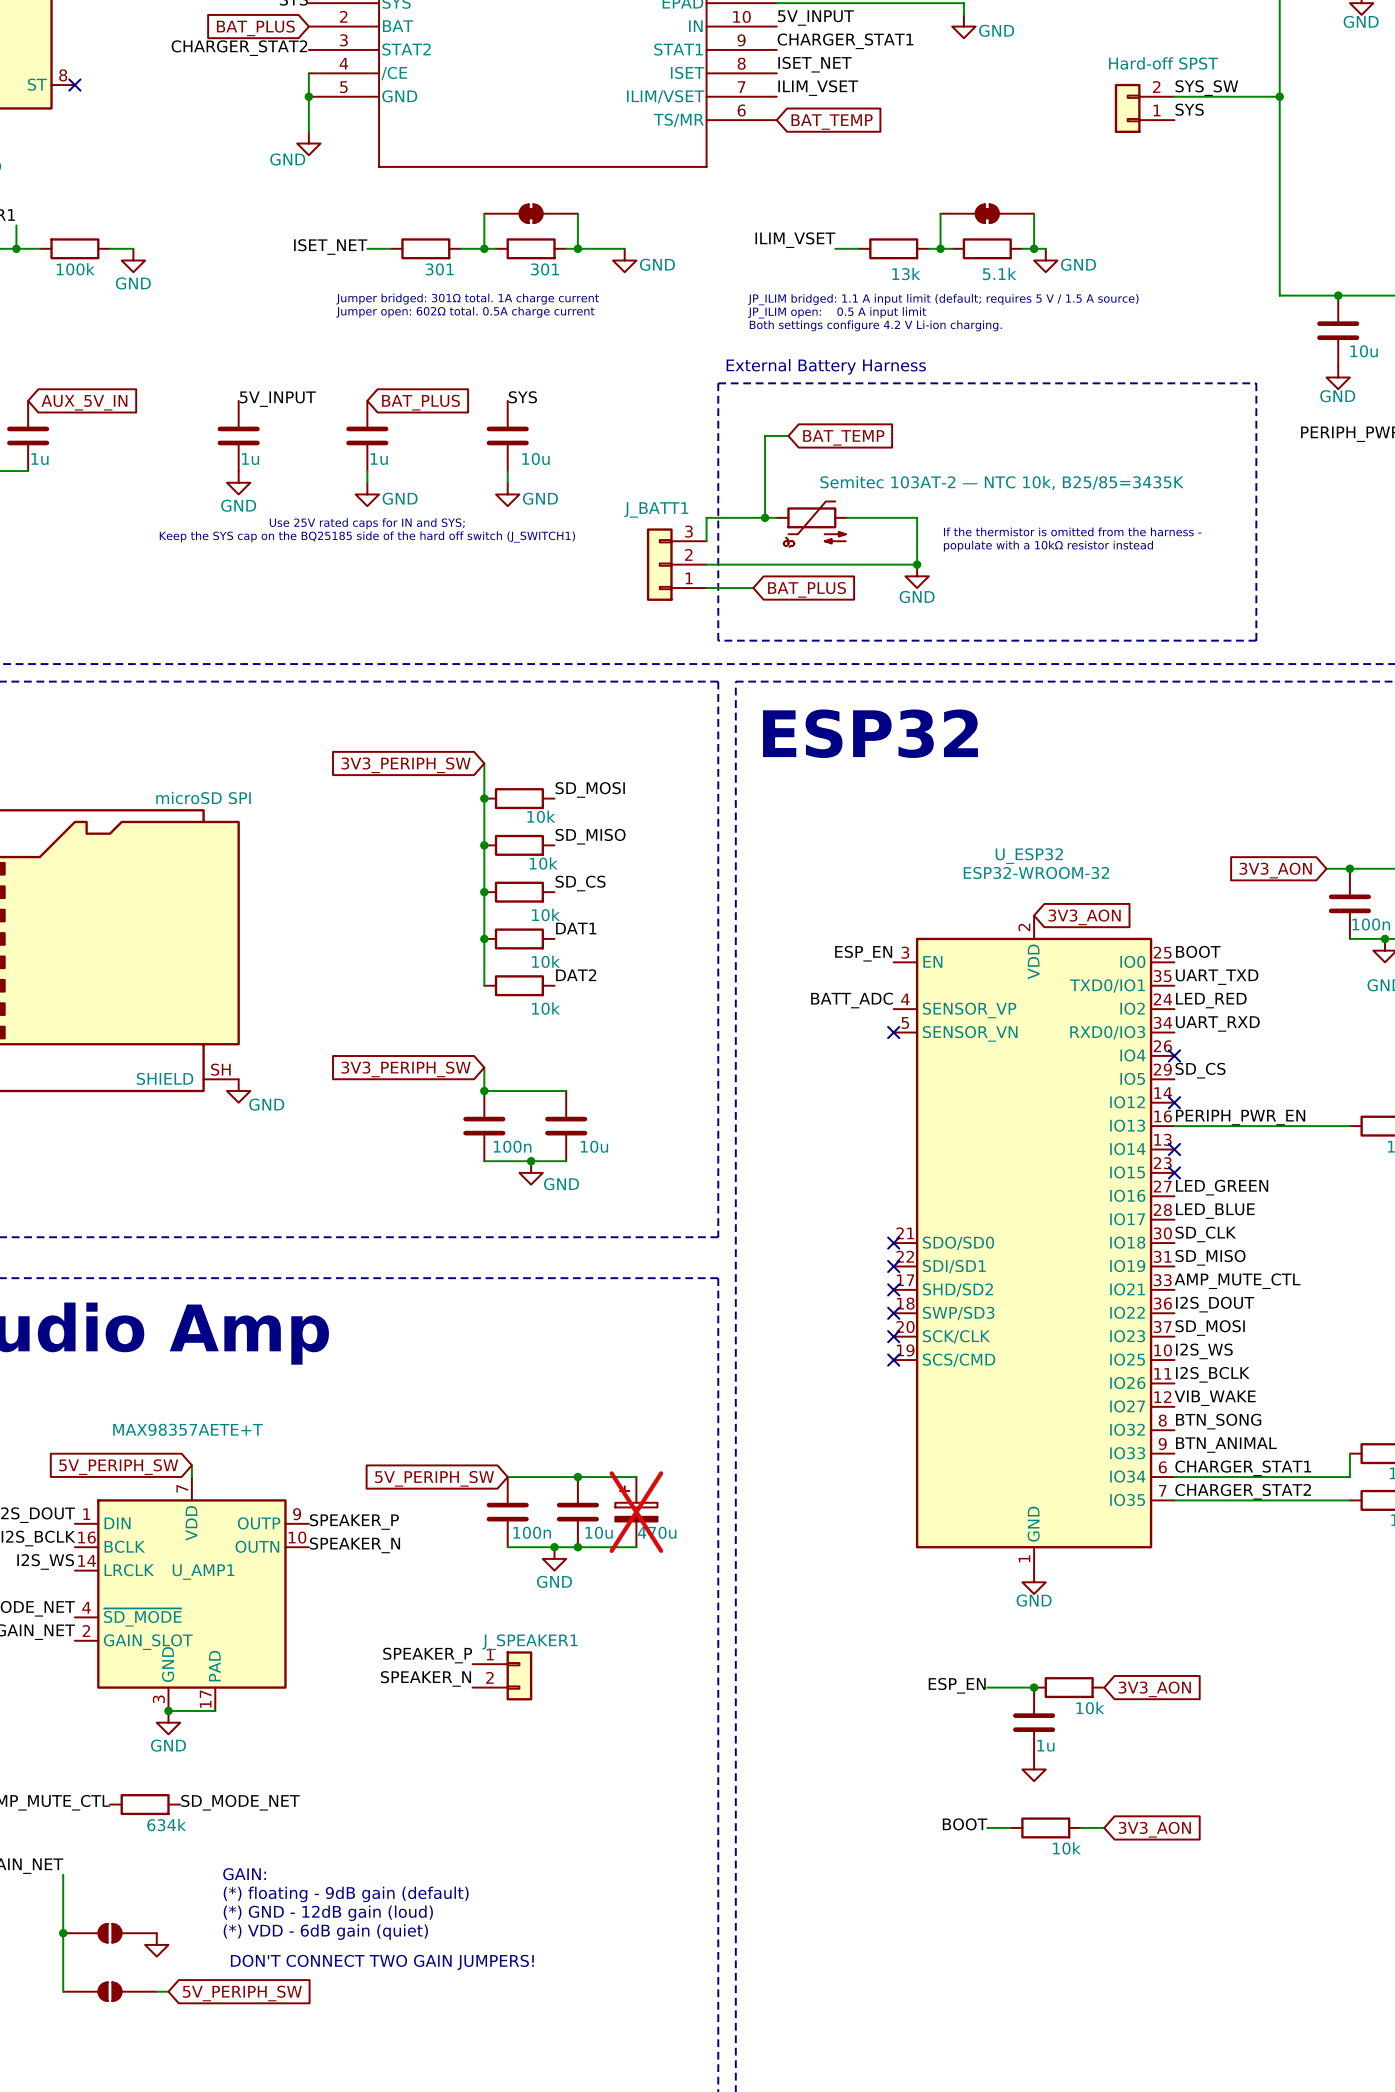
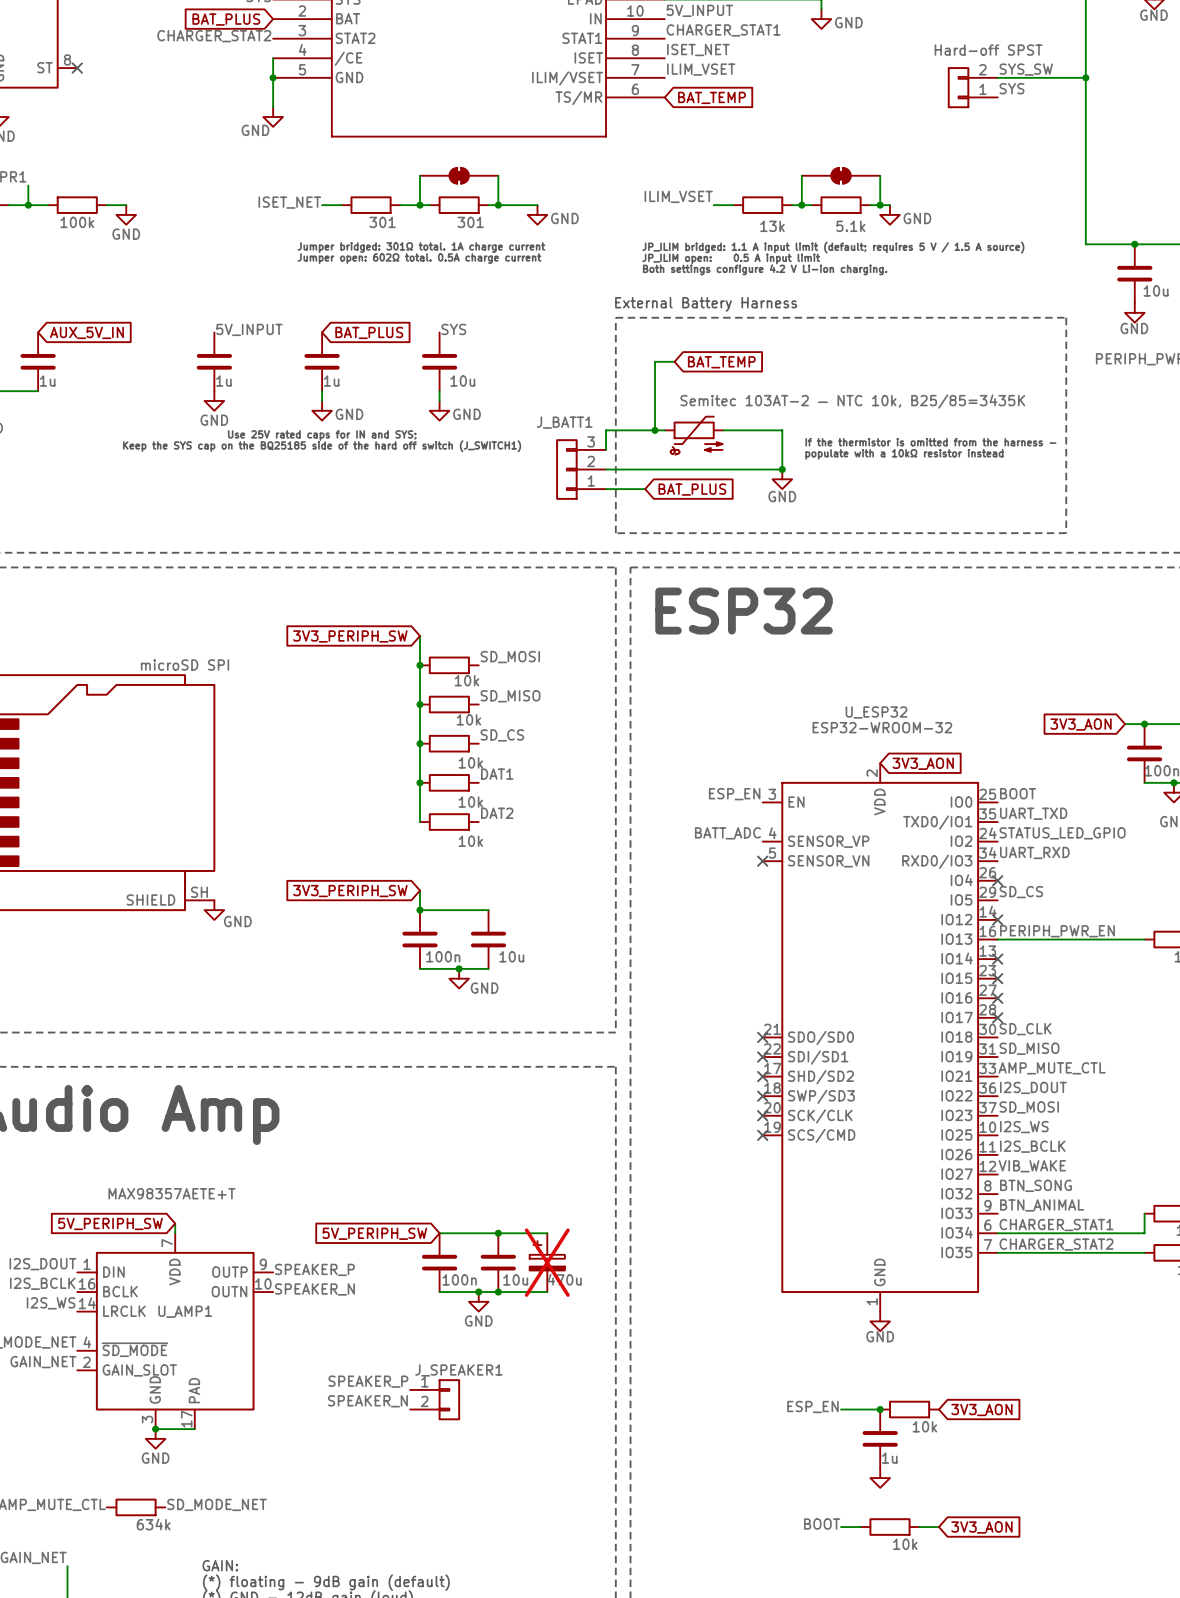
label: LED_RED (1211, 1000) -> STATUS_LED_GPIO (1062, 833)
label: LED_GREEN (1222, 1187) -> none
no-connect mark: none -> (997, 998)
label: LED_BLUE (1215, 1211) -> none
no-connect mark: none -> (997, 1017)

